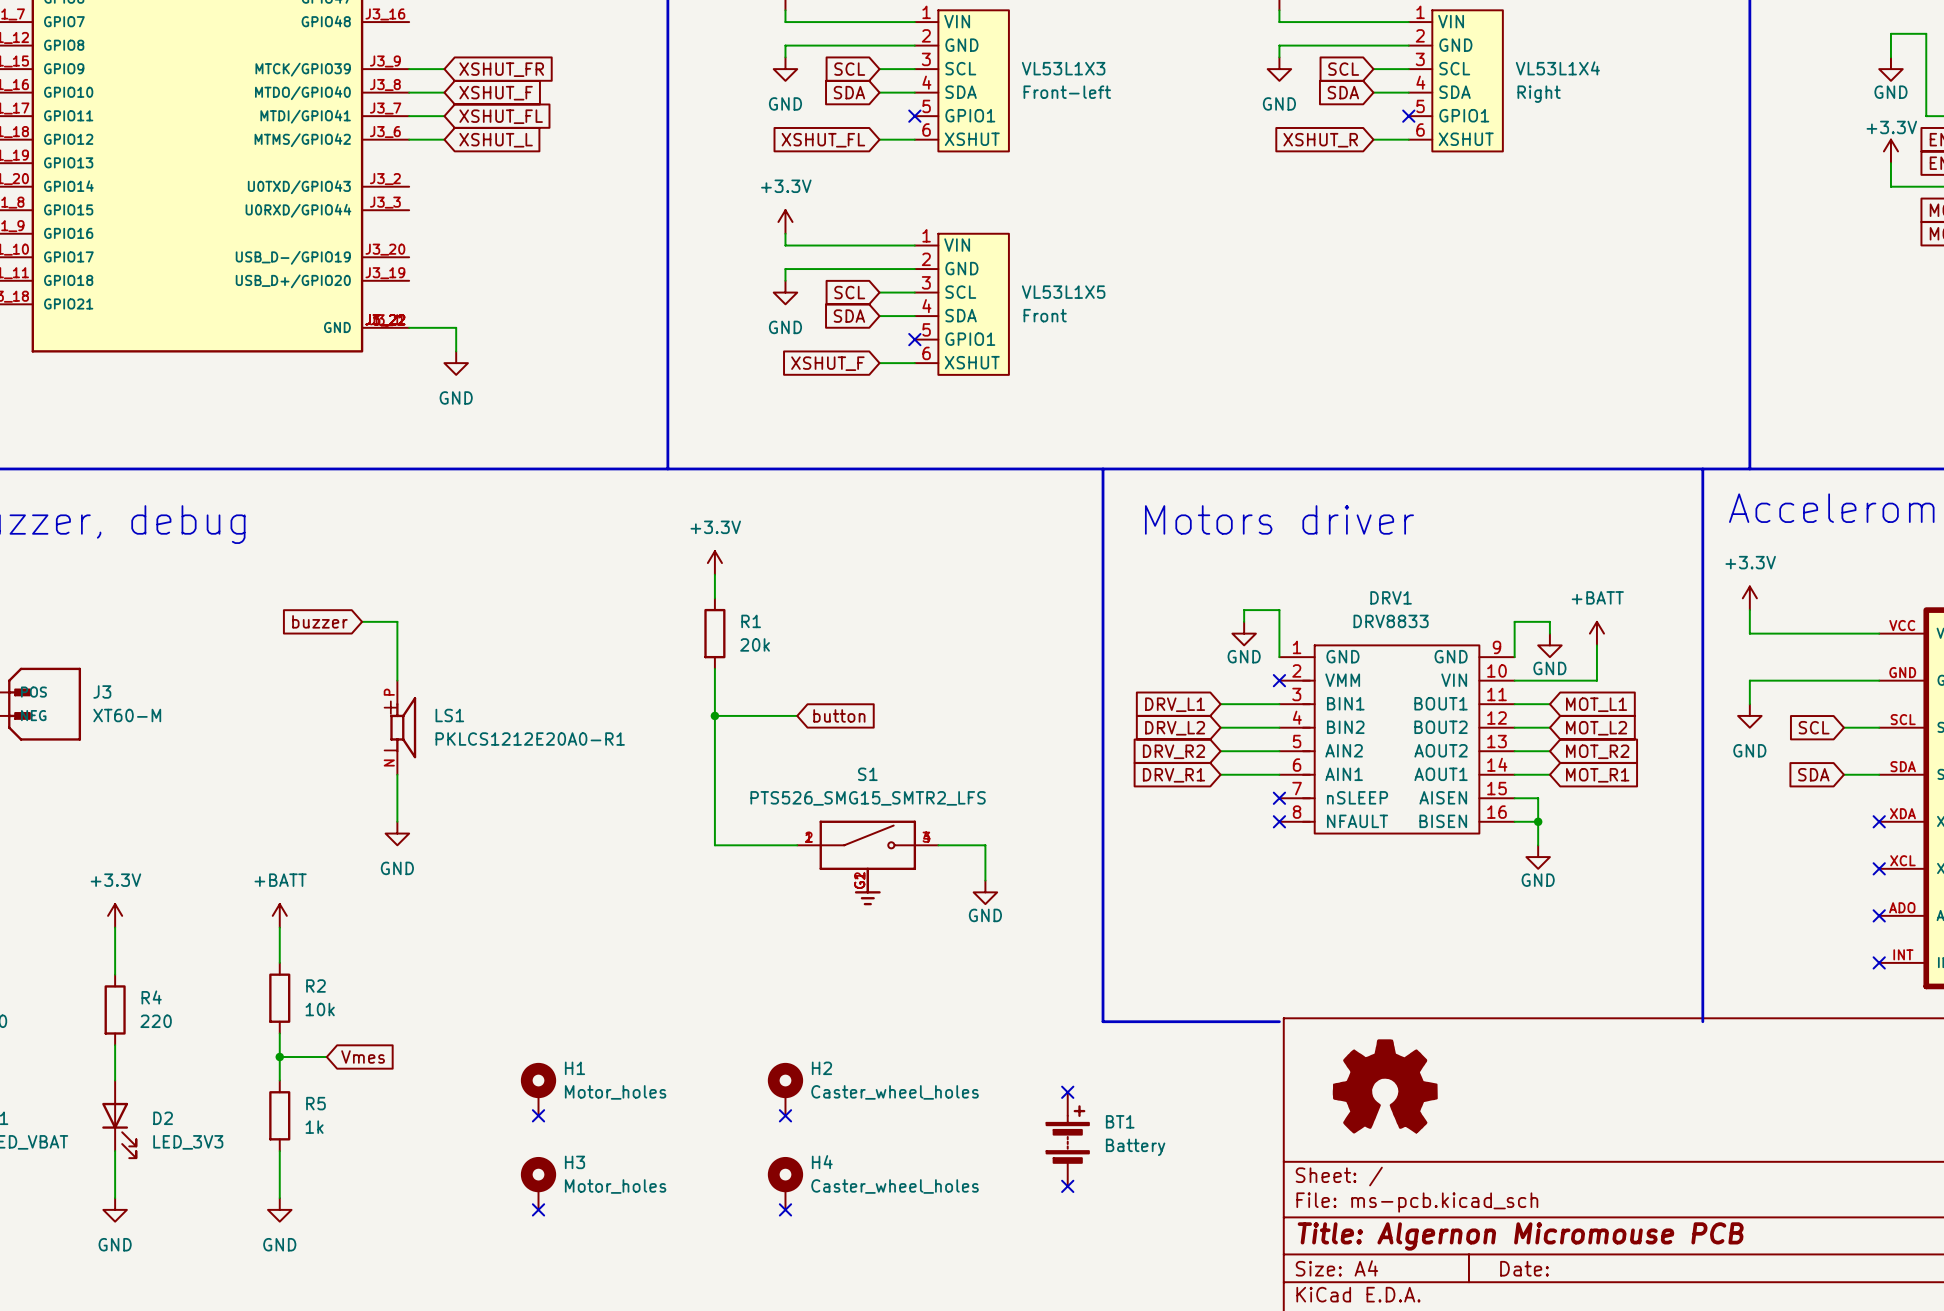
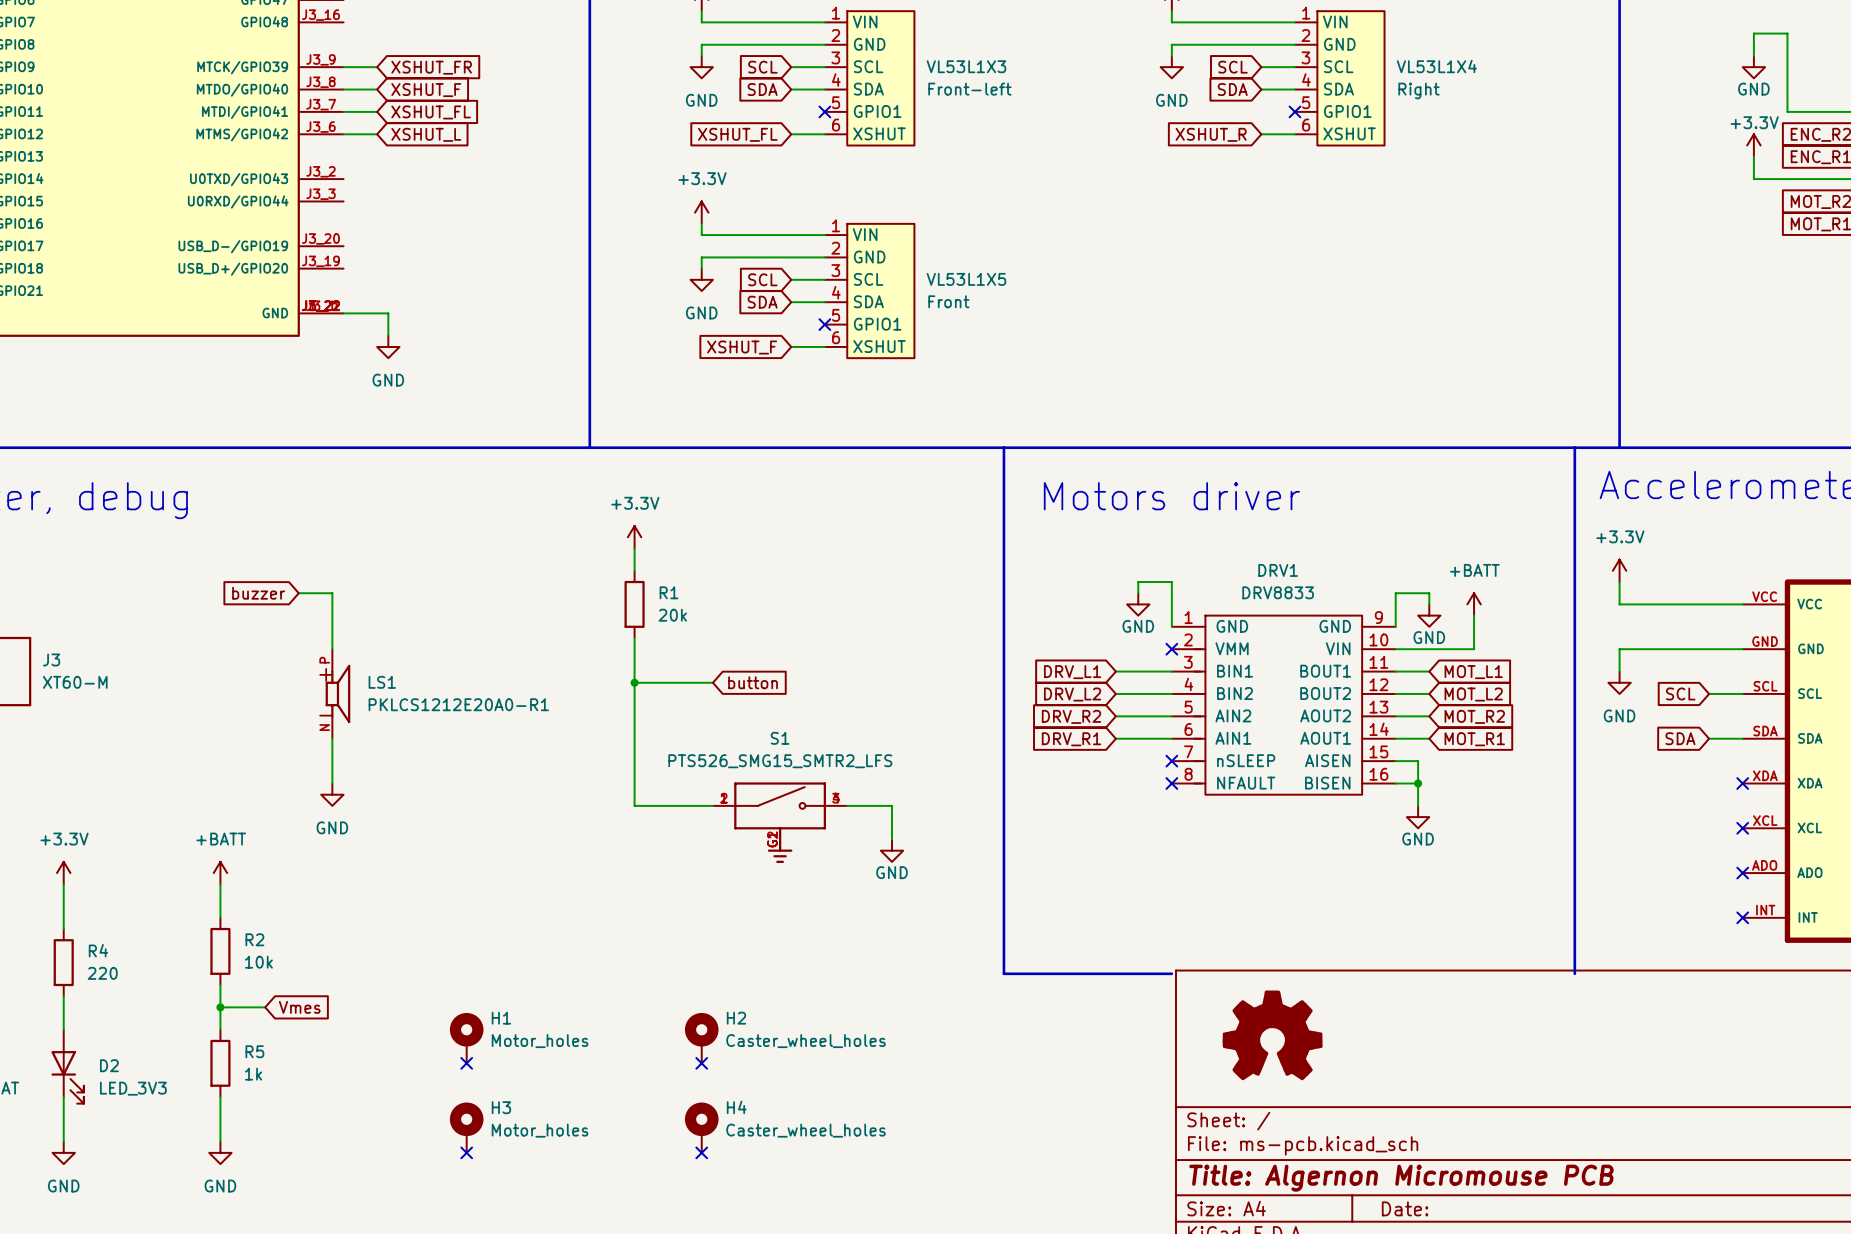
no-connect mark: (1067, 1092) -> none
BT1: Battery (1067, 1139) -> none
no-connect mark: (1067, 1186) -> none

